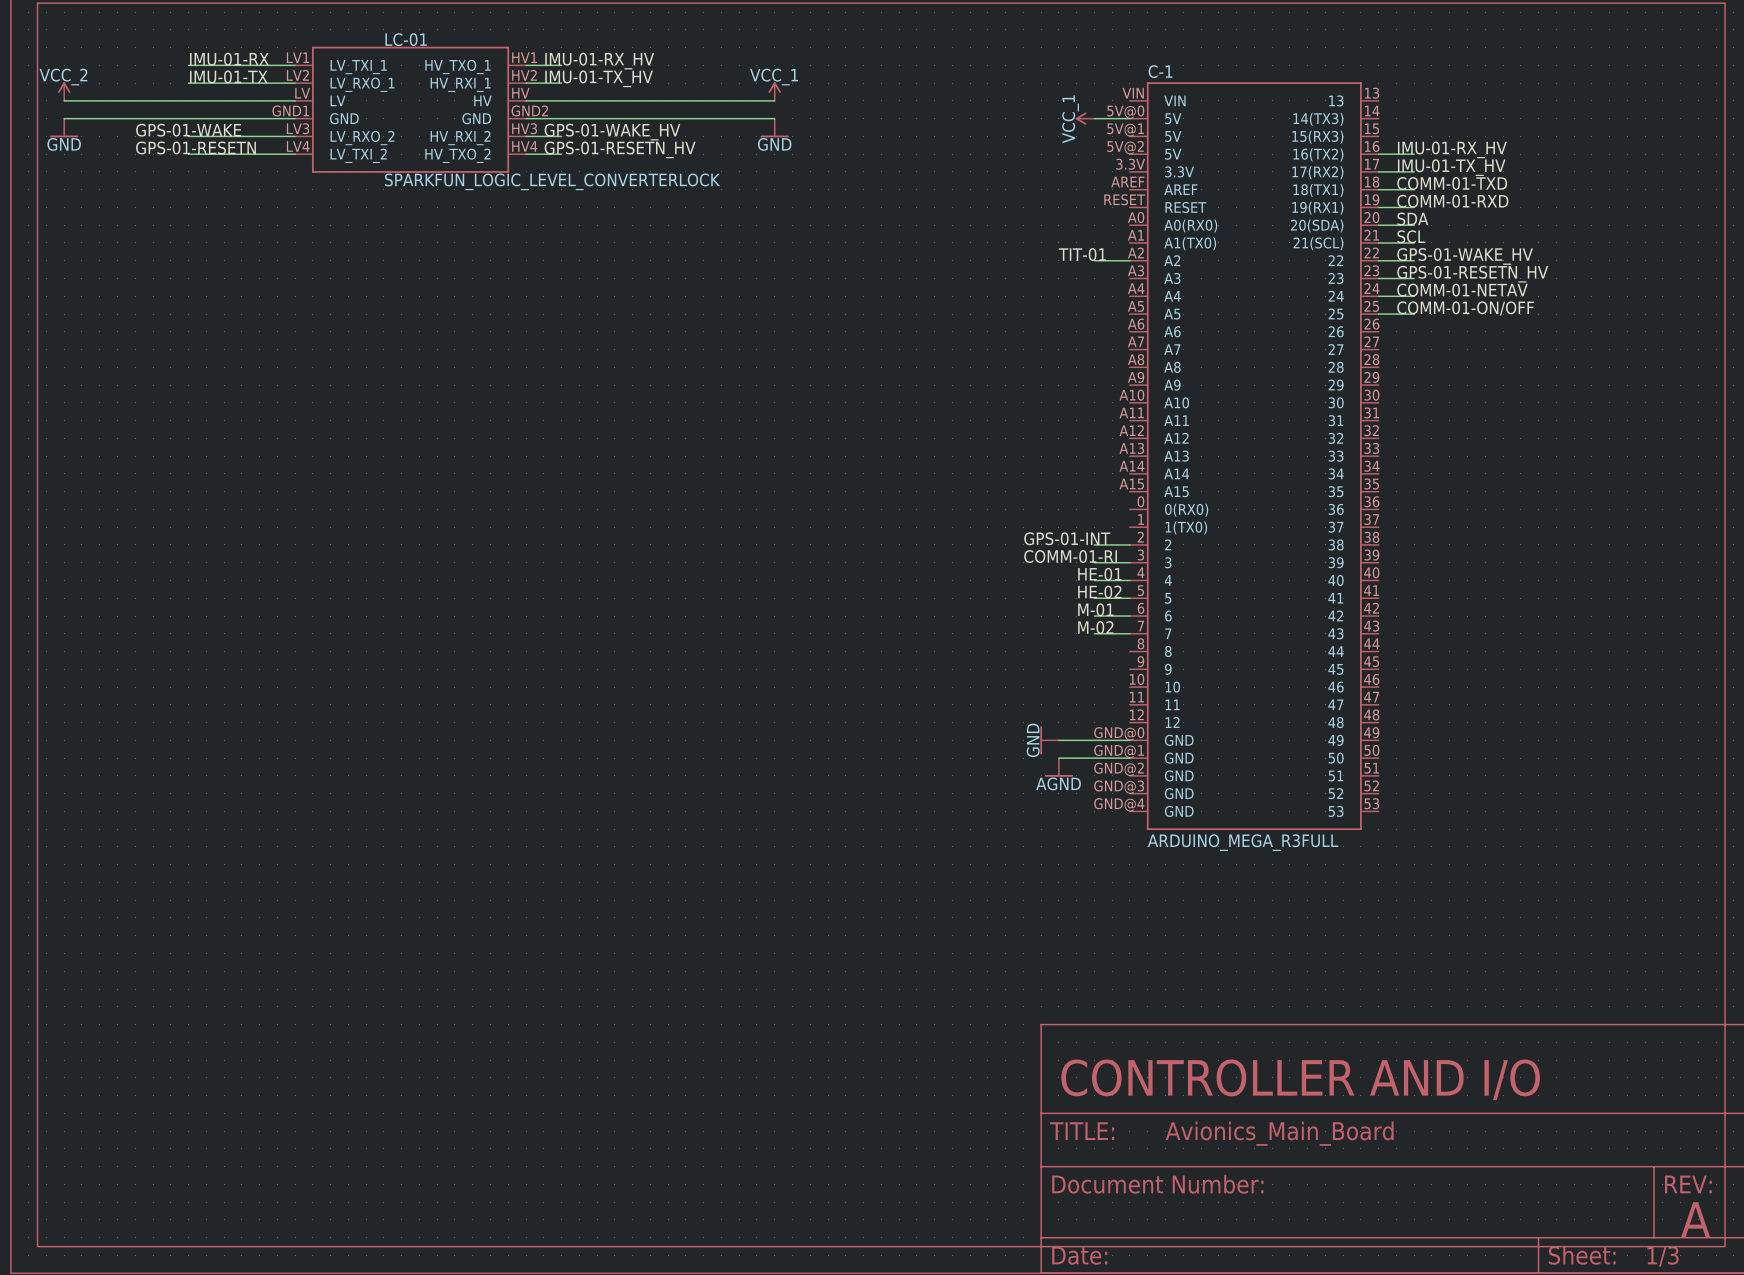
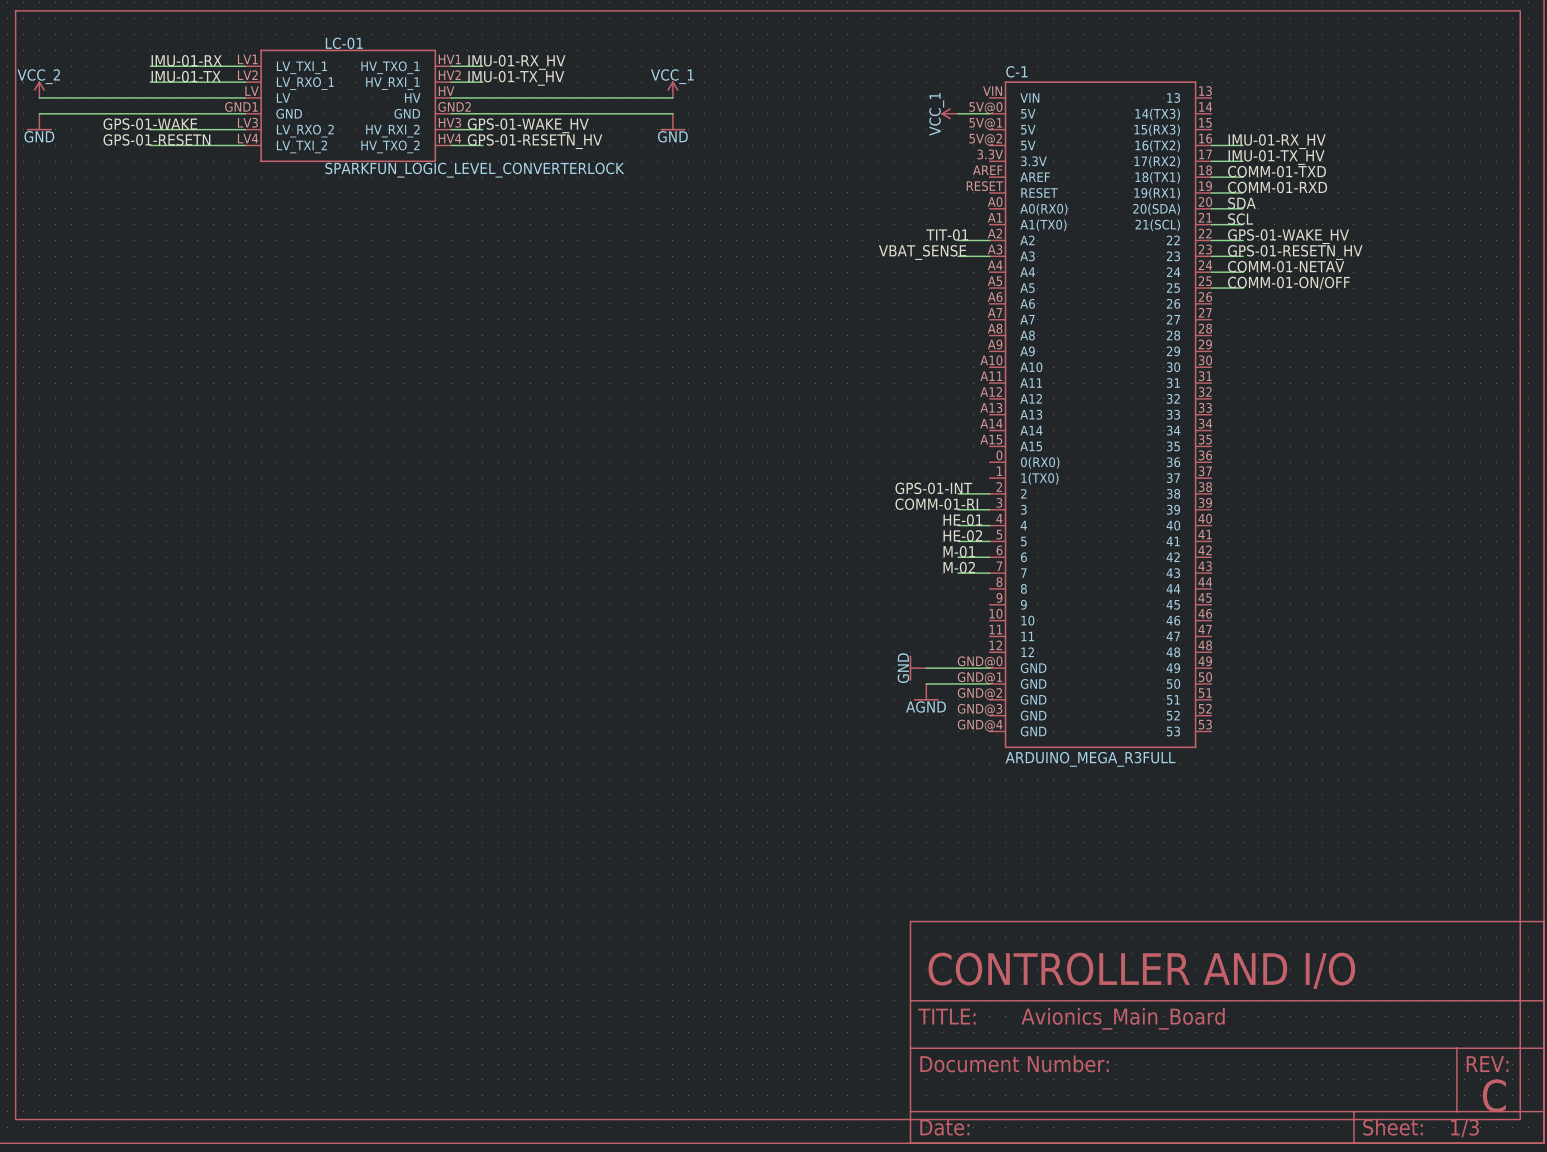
label: none -> VBAT_SENSE (922, 252)
wire: none -> (958, 256) (989, 256)
text: A (1695, 1219) -> C (1494, 1095)

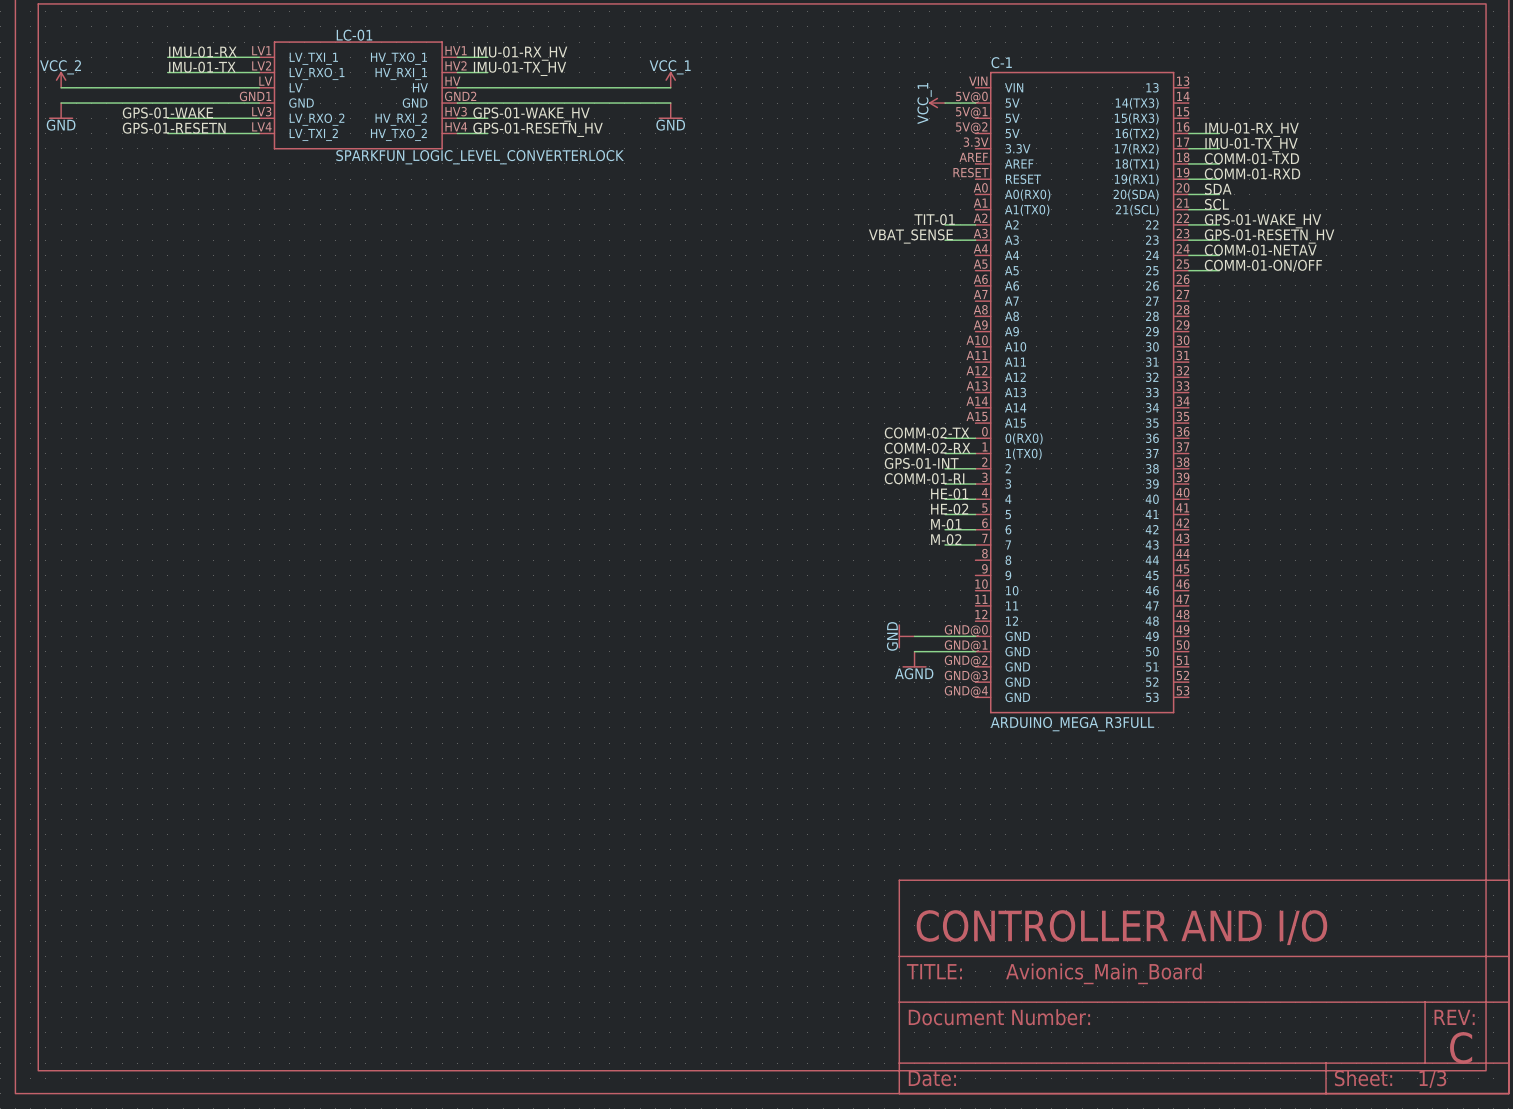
label: none -> COMM-02-TX (927, 432)
wire: none -> (945, 438) (975, 438)
label: none -> COMM-02-RX (927, 448)
wire: none -> (945, 453) (975, 453)

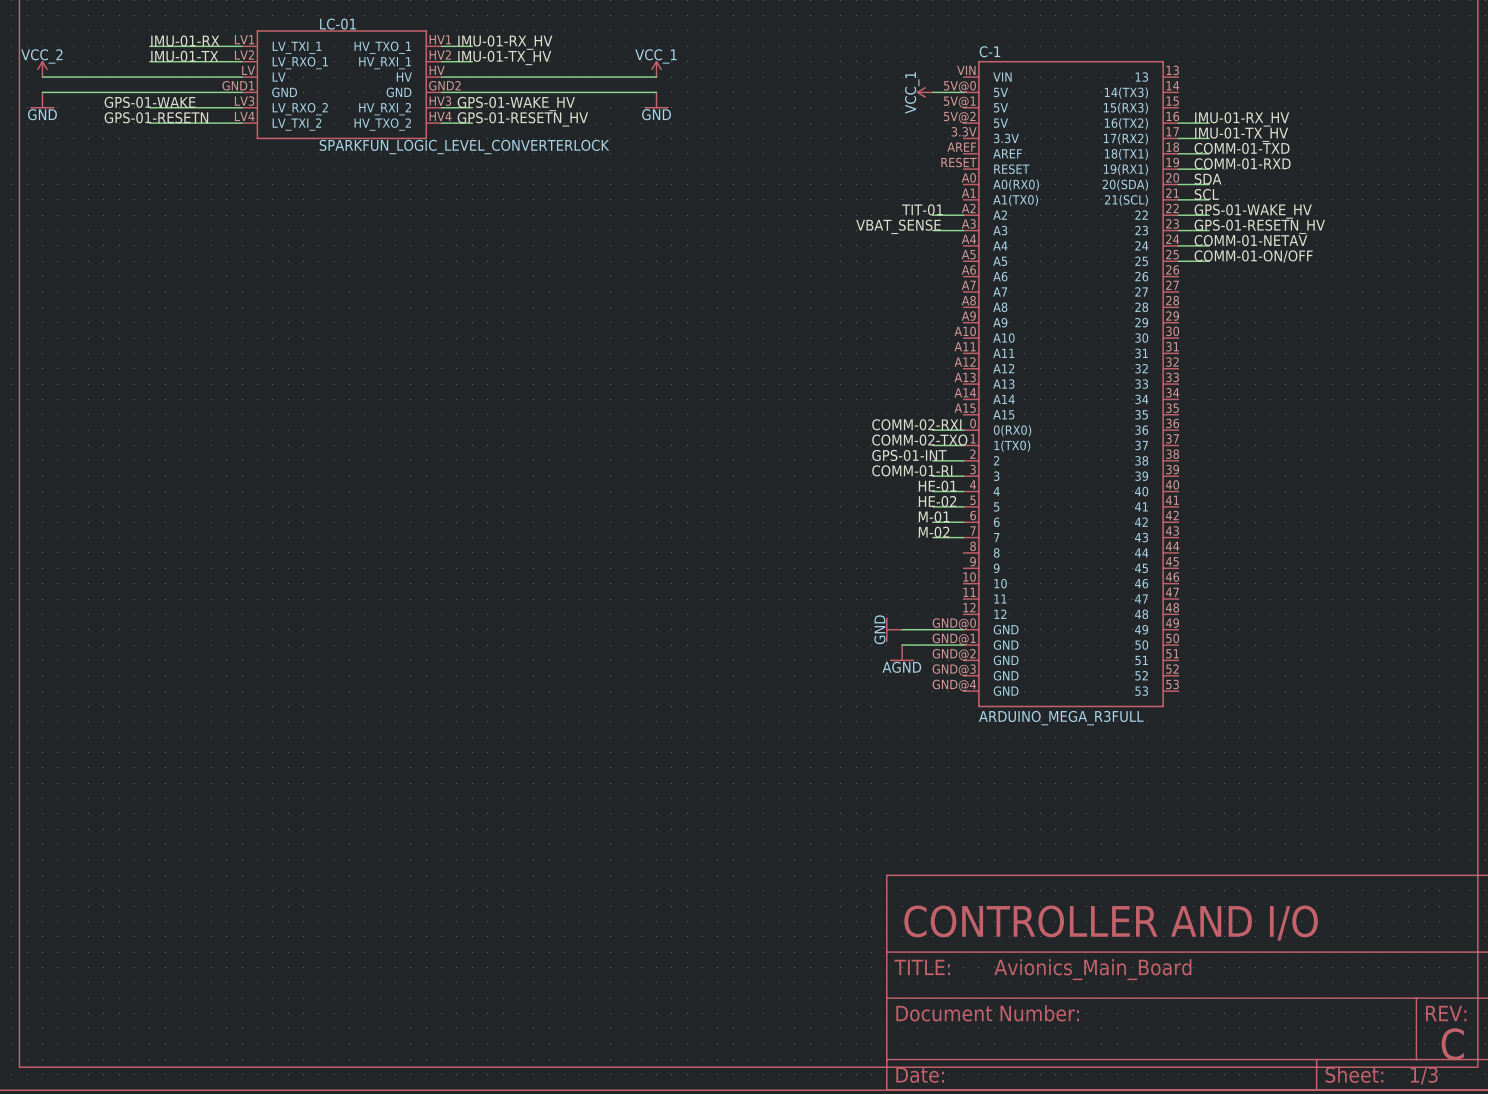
label: COMM-02-TX (927, 432) -> COMM-02-RXI (916, 424)
label: COMM-02-RX (927, 448) -> COMM-02-TXO (919, 440)

